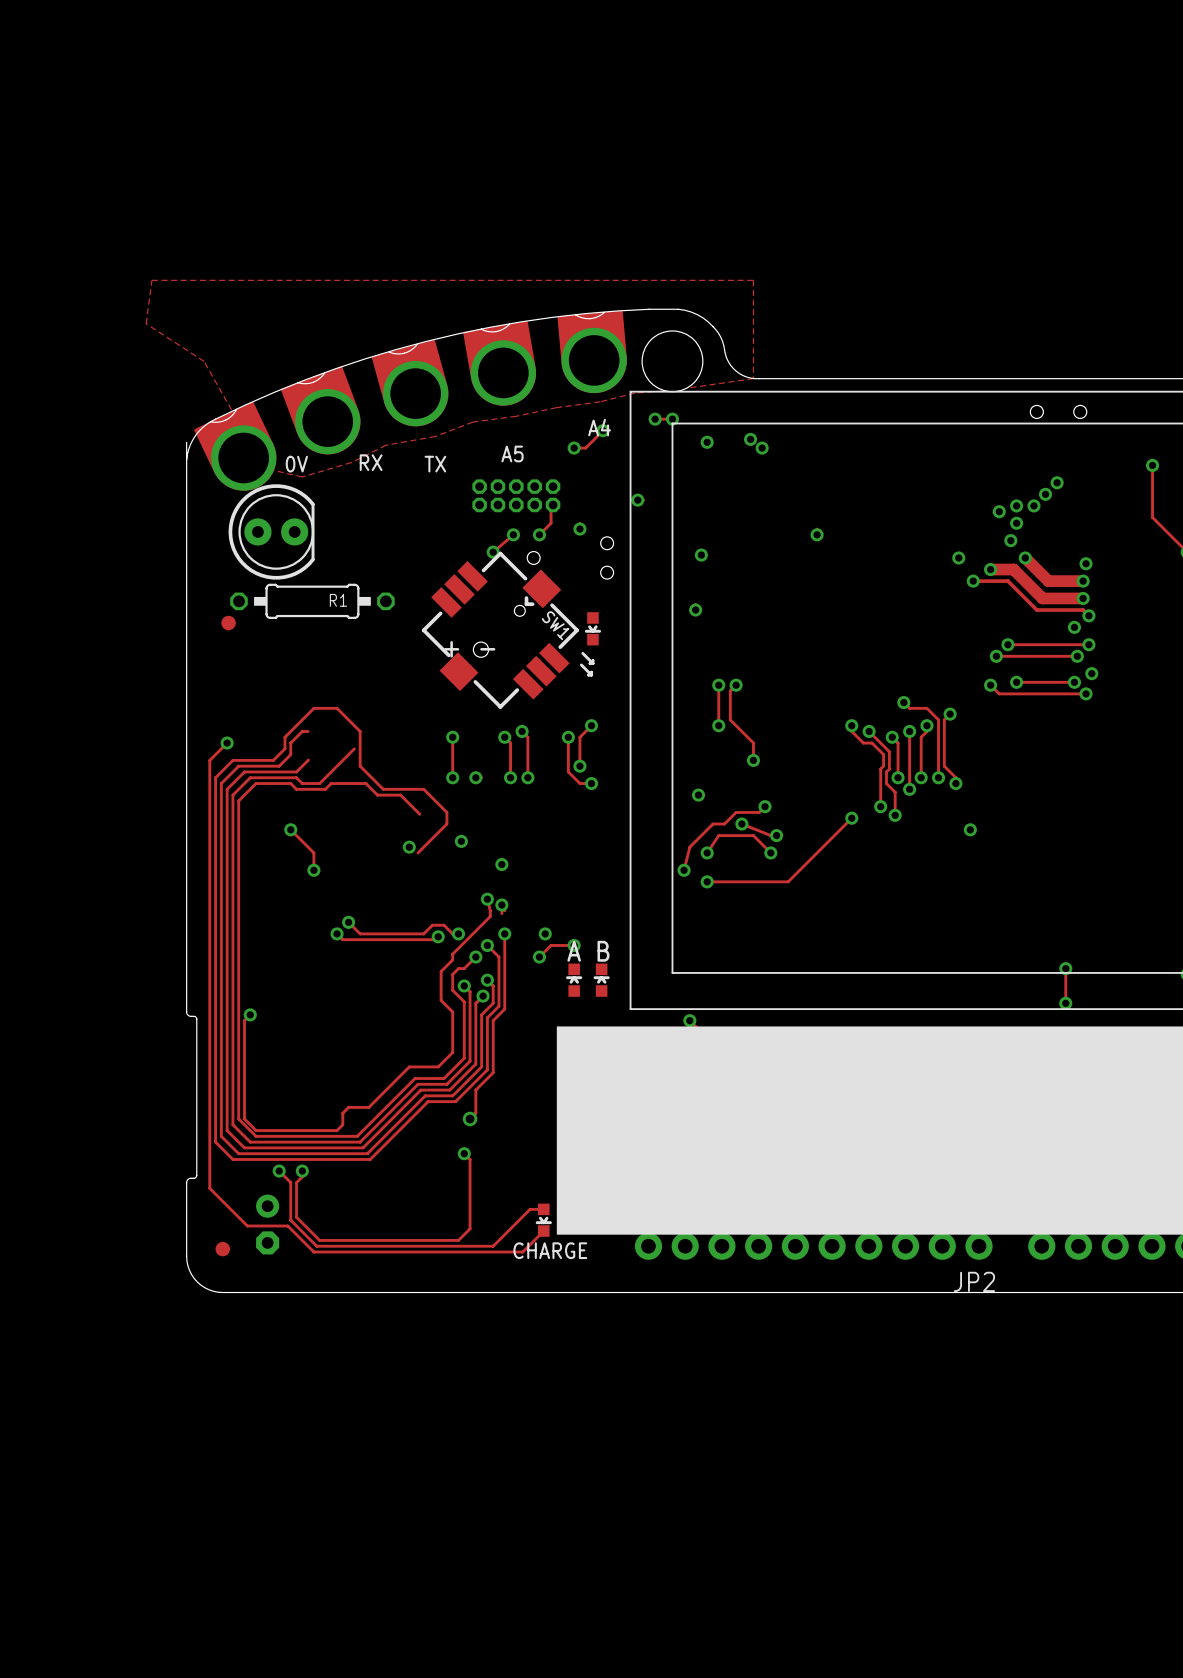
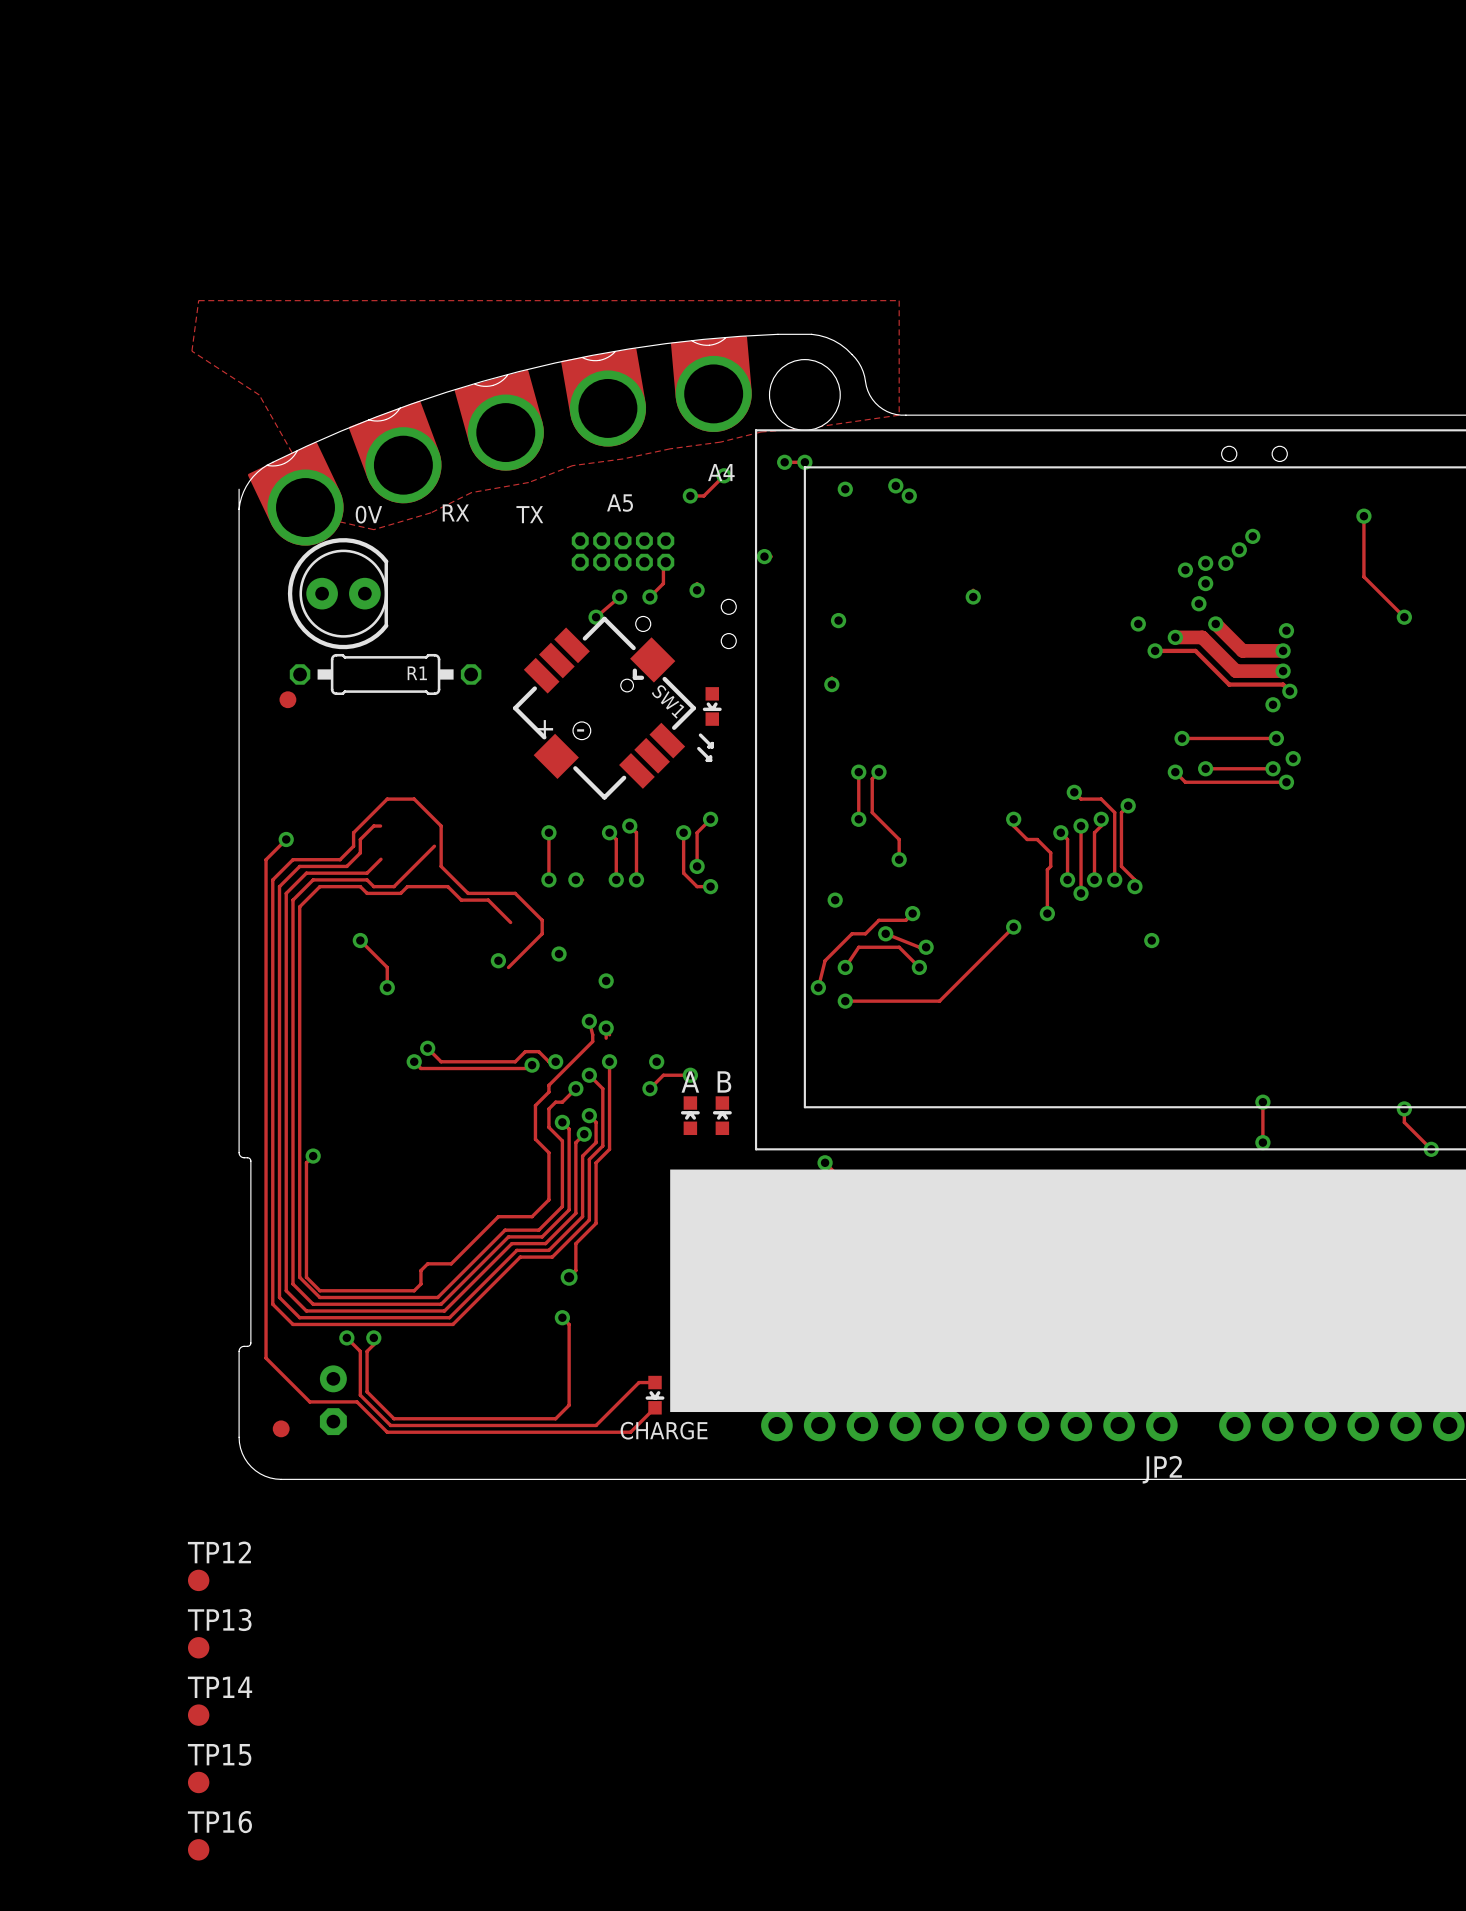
track: (1007, 644) (1088, 644) -> none
via: (1007, 644) -> none
via: (1088, 644) -> none
track: (869, 731) (889, 751) (889, 769) (886, 771) (886, 783) (895, 792) (895, 815) -> none
via: (869, 731) -> none
via: (895, 815) -> none
TP12: none -> (198, 1580)
TP13: none -> (198, 1647)
TP14: none -> (198, 1715)
TP15: none -> (198, 1782)
TP16: none -> (198, 1849)

